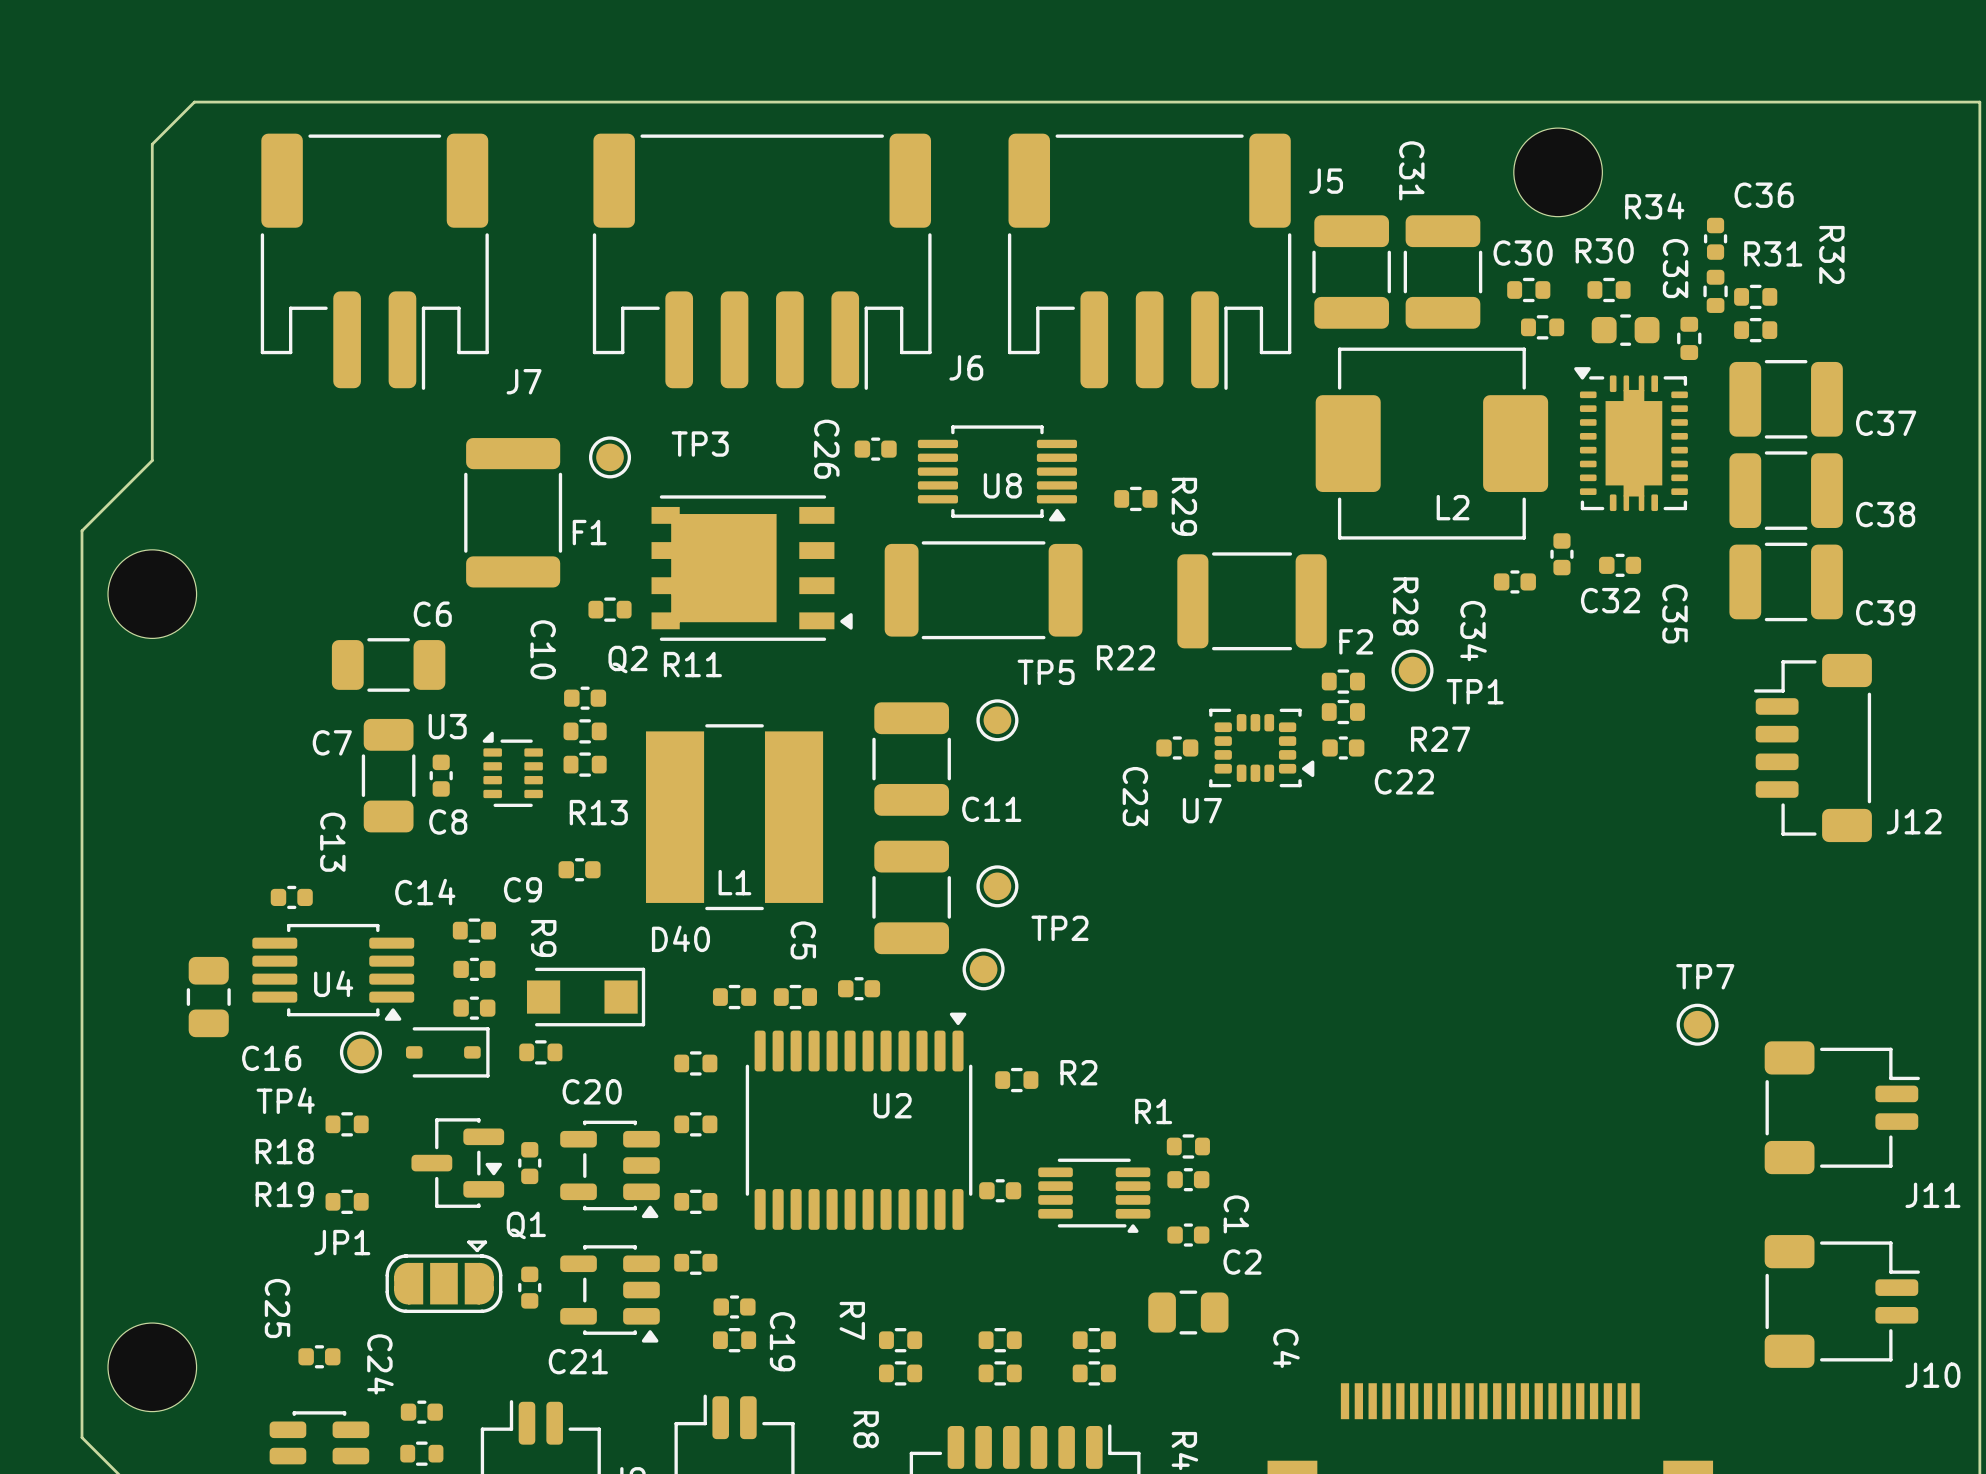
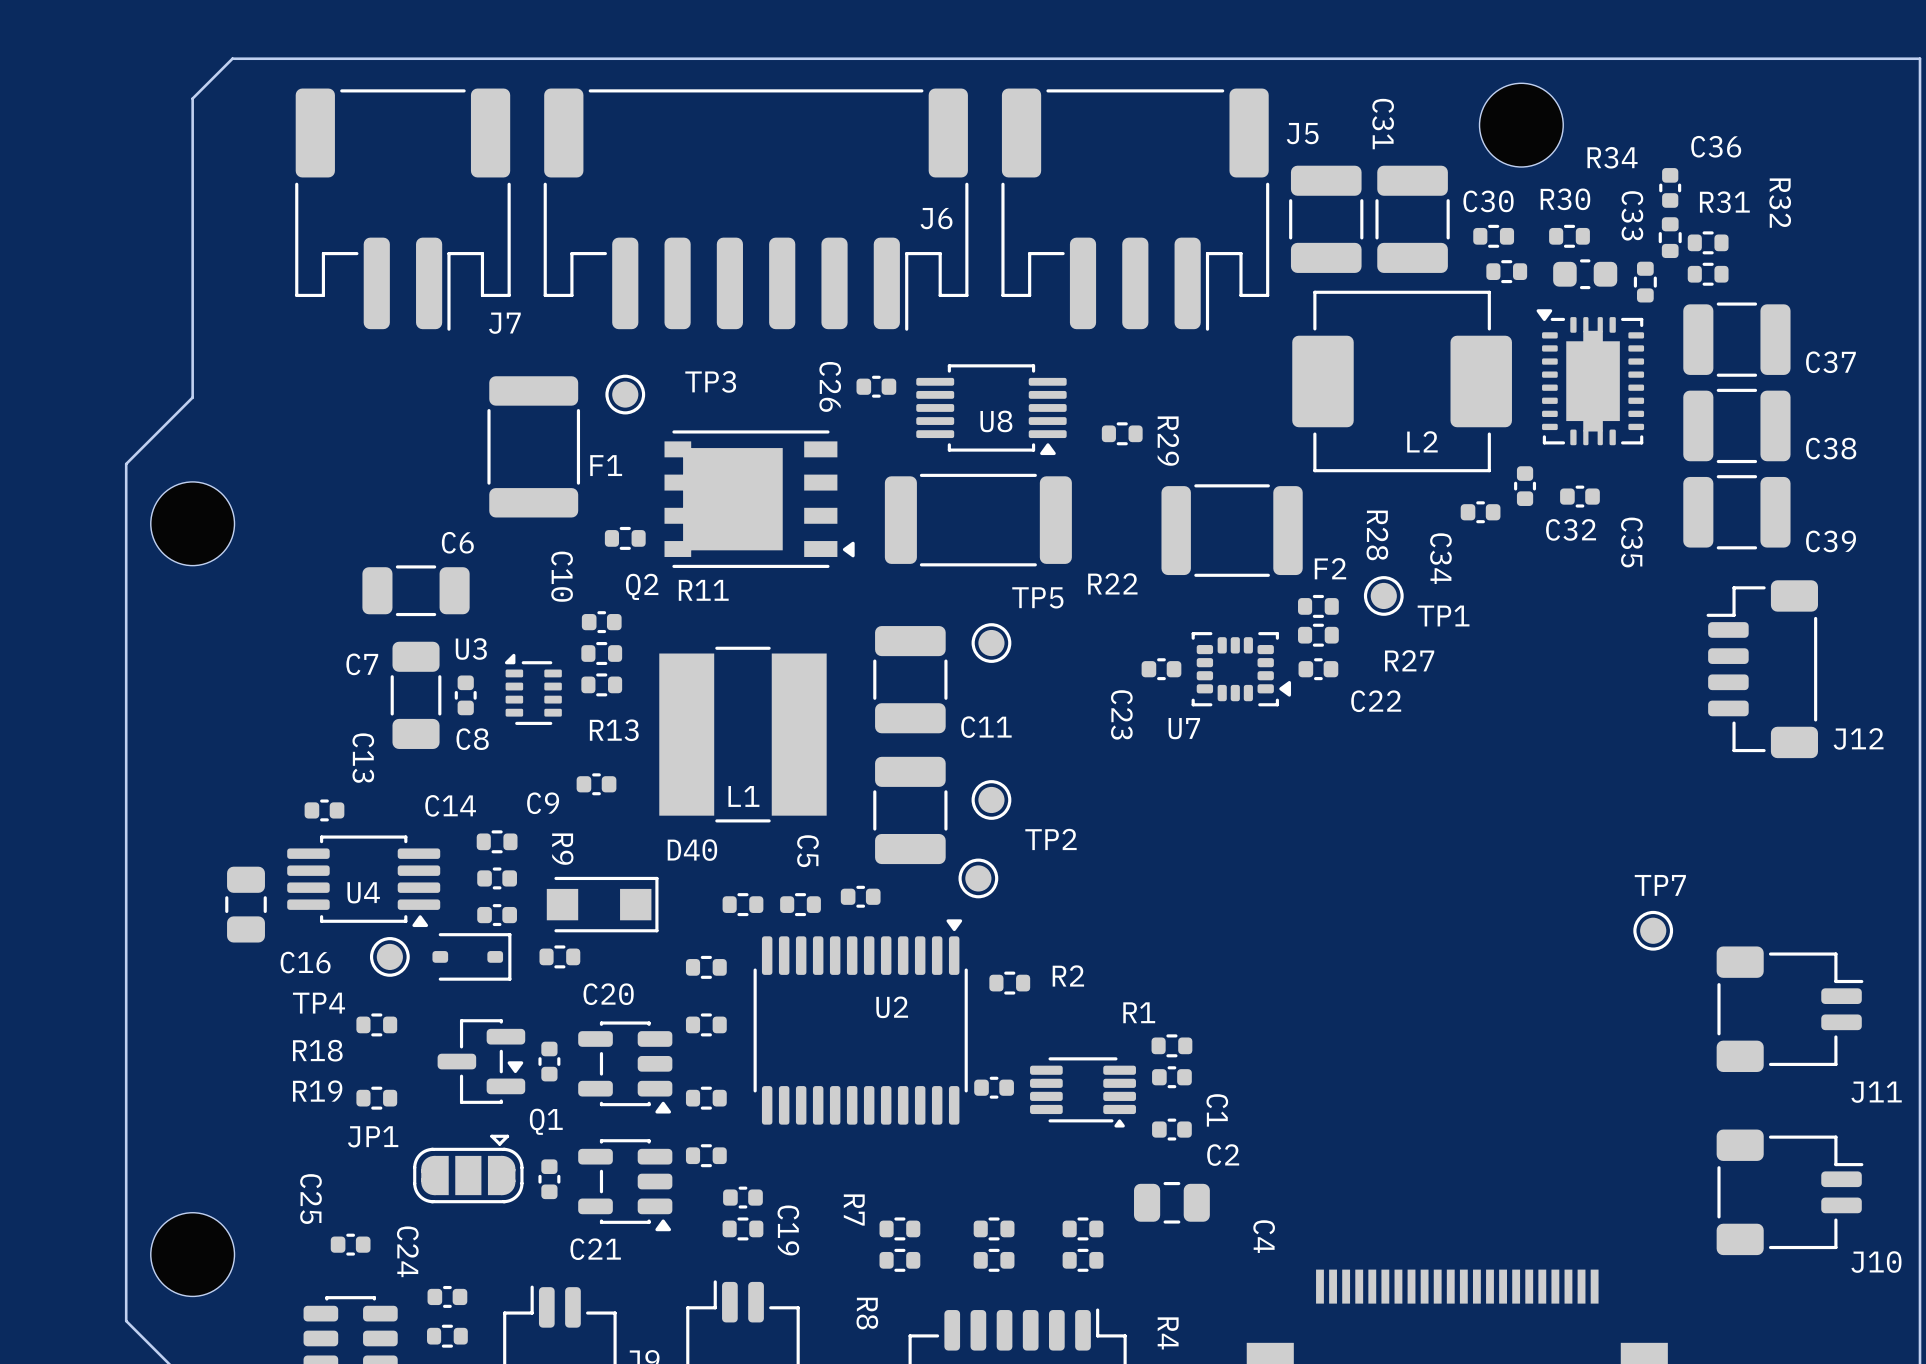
J6 footprint: [592, 133, 932, 390] -> [543, 88, 969, 331]
J6 name position: J6 (966, 367) -> J6 (936, 218)
J7 name position: J7 (524, 381) -> J7 (504, 323)

